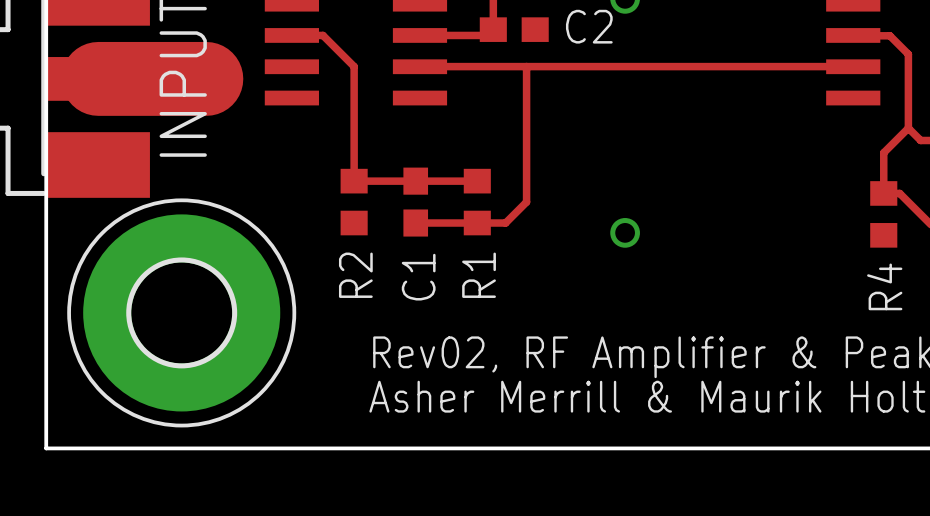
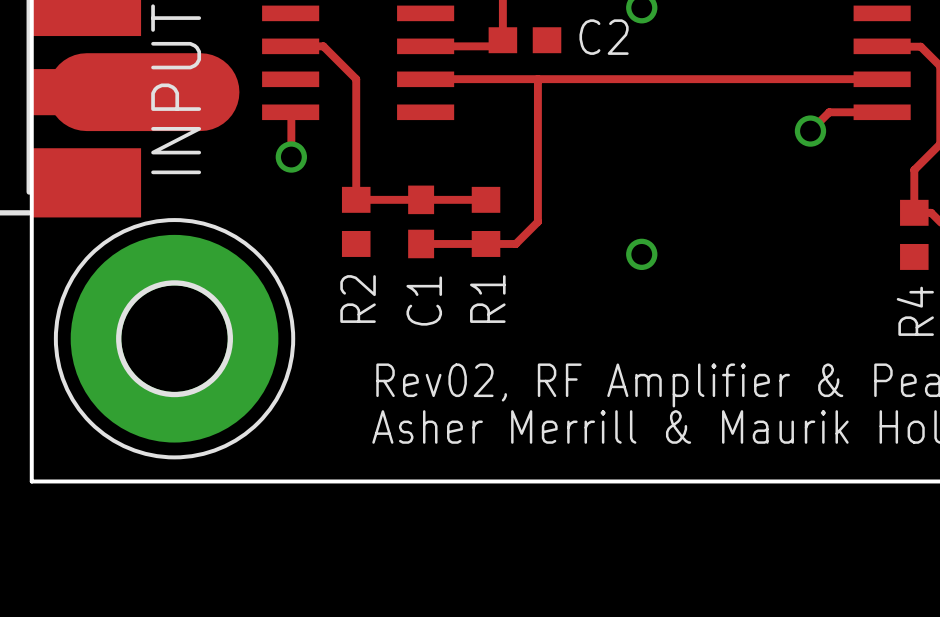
track: none -> (290, 112) (291, 157)
track: none -> (882, 112) (829, 112) (810, 131)
via: none -> (810, 131)
via: none -> (291, 157)

